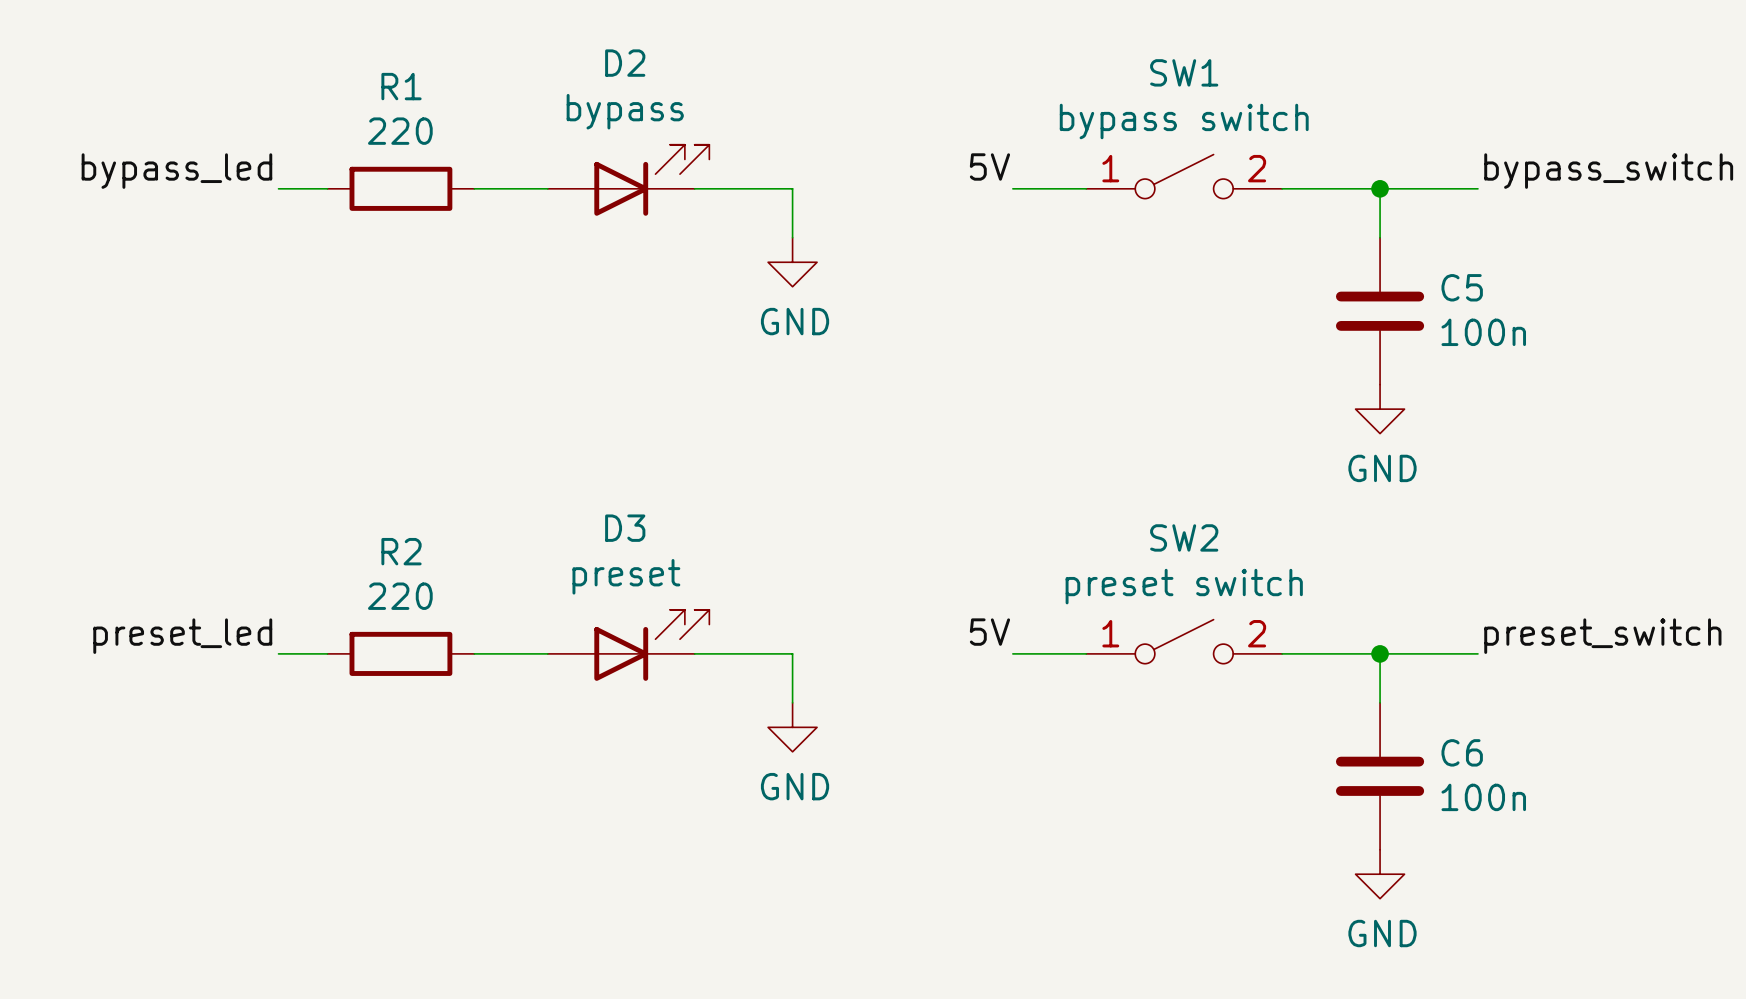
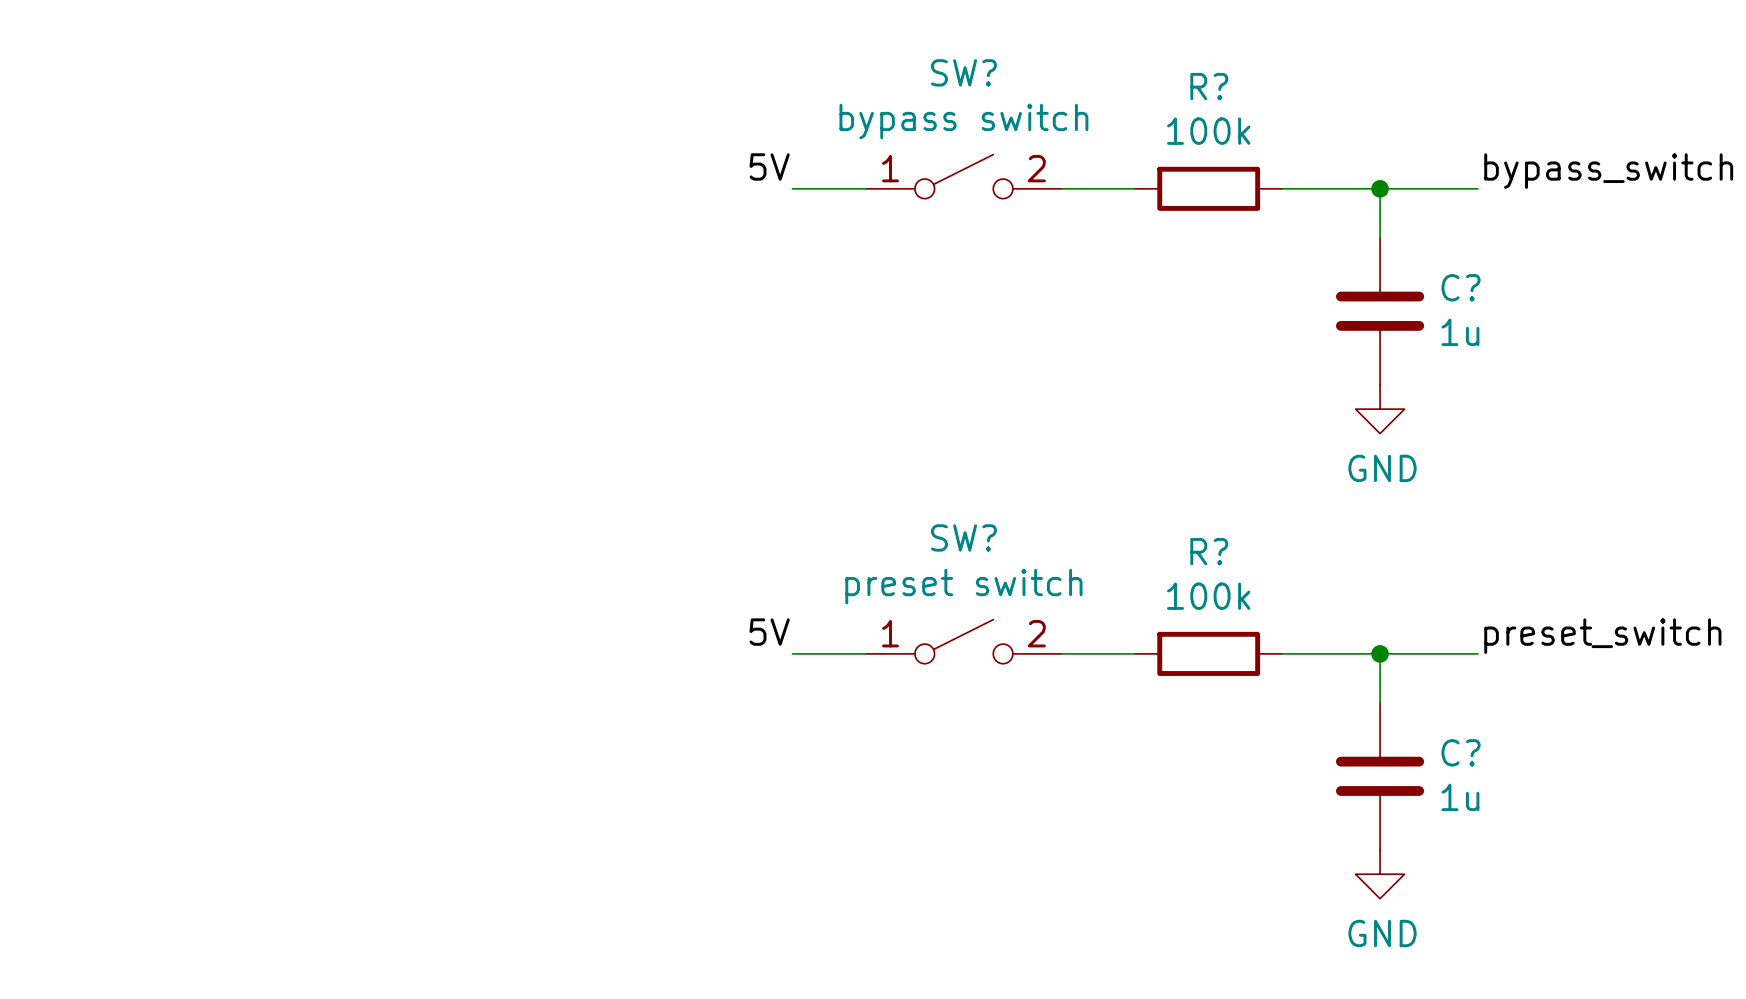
label position: 5V (989, 166) -> 5V (769, 166)
label: bypass_led (176, 171) -> none
SW?: none -> bypass switch (963, 176)
SW1: bypass switch (1184, 176) -> none
D2: bypass (628, 180) -> none
wire: (278, 188) (327, 188) -> none
R1: 220 (400, 188) -> none
wire: (474, 188) (547, 188) -> (792, 188) (866, 188)
wire: (694, 188) (792, 188) (792, 237) -> none
R?: none -> 100k (1208, 188)
power symbol: GND (792, 262) -> none
C5 name: C5 (1462, 287) -> C? (1461, 287)
C5 value: 100n (1483, 332) -> 1u (1460, 332)
label position: 5V (989, 632) -> 5V (769, 632)
label: preset_led (182, 636) -> none
SW?: none -> preset switch (963, 641)
SW2: preset switch (1184, 641) -> none
D3: preset (628, 645) -> none
wire: (278, 653) (327, 653) -> none
R2: 220 (400, 653) -> none
wire: (474, 653) (547, 653) -> (792, 653) (866, 653)
wire: (694, 653) (792, 653) (792, 702) -> none
R?: none -> 100k (1208, 653)
power symbol: GND (792, 727) -> none
C6 name: C6 (1462, 752) -> C? (1461, 752)
C6 value: 100n (1483, 797) -> 1u (1460, 797)

